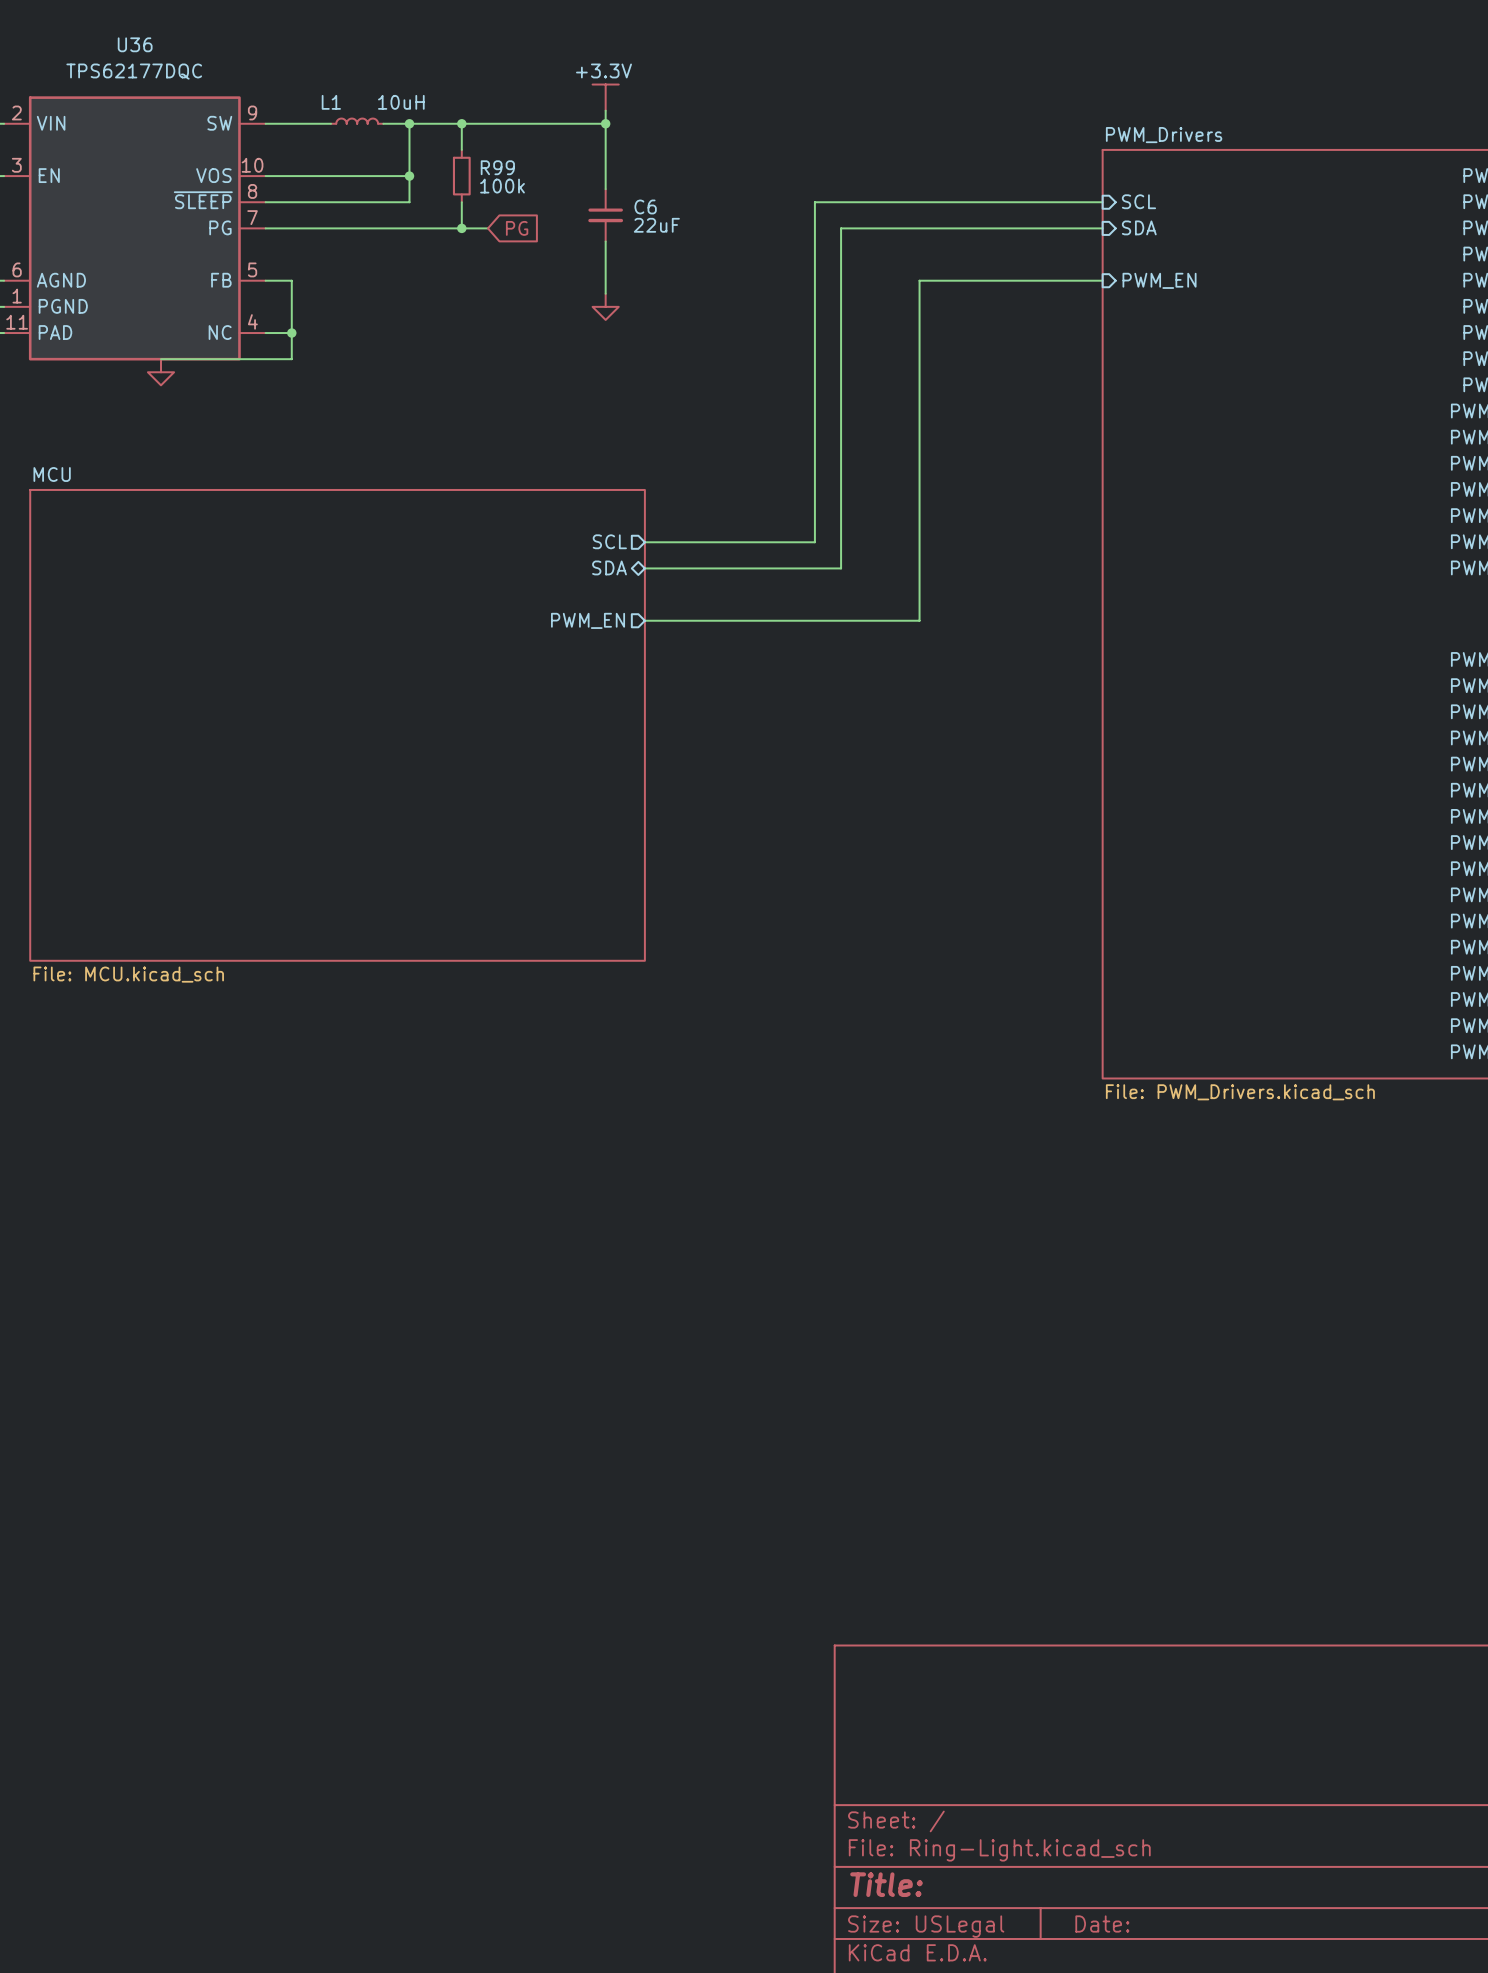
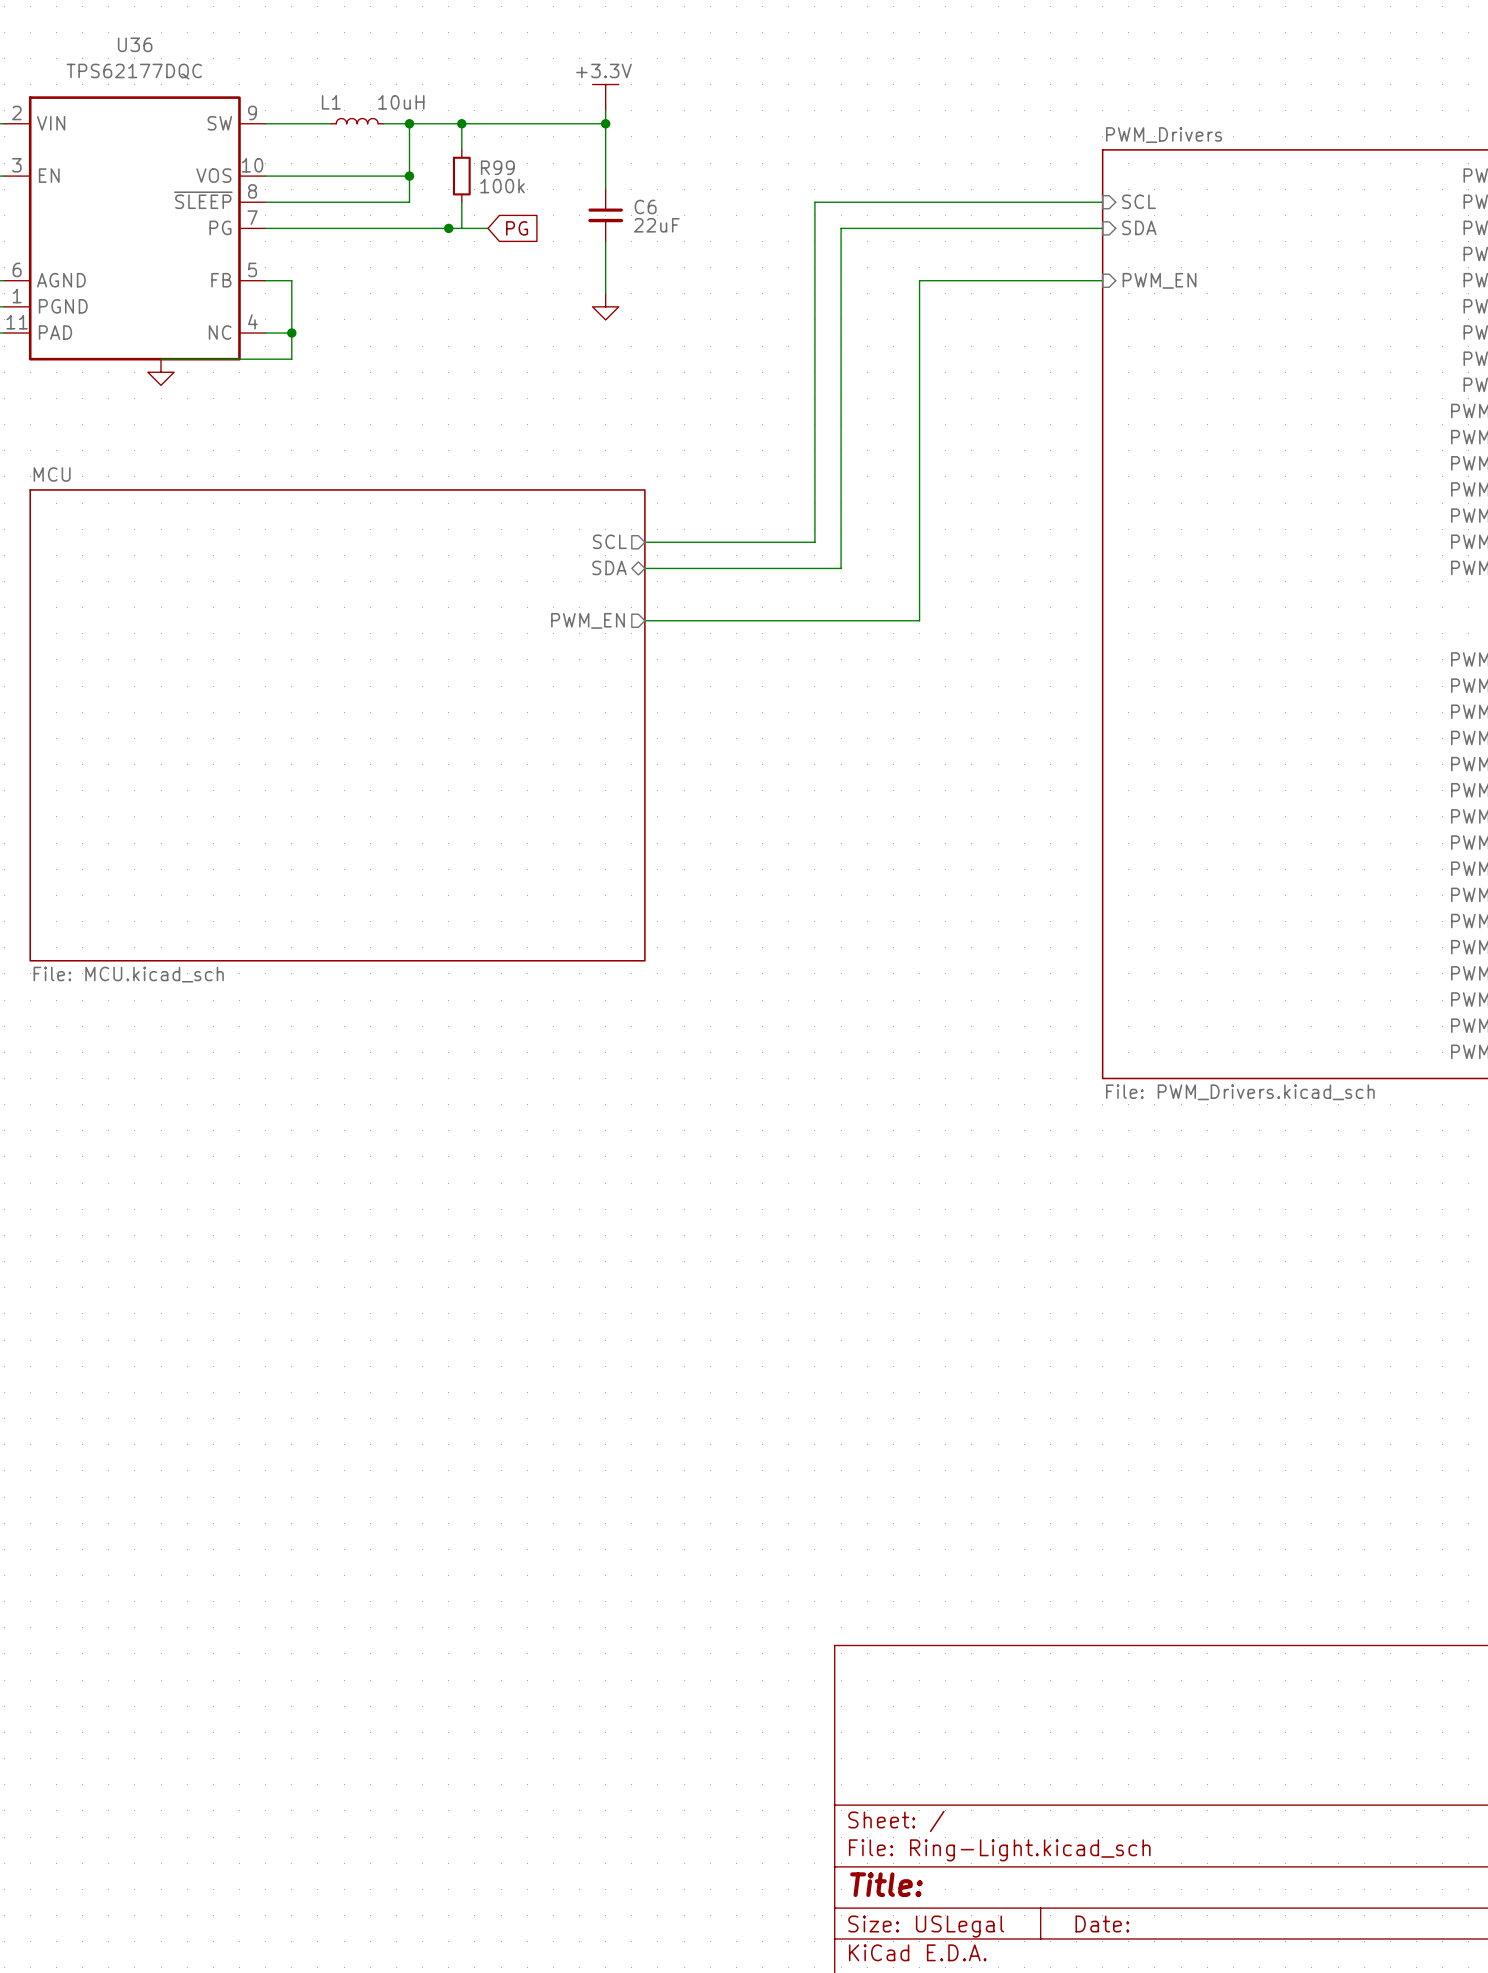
junction position: (461, 228) -> (448, 228)

